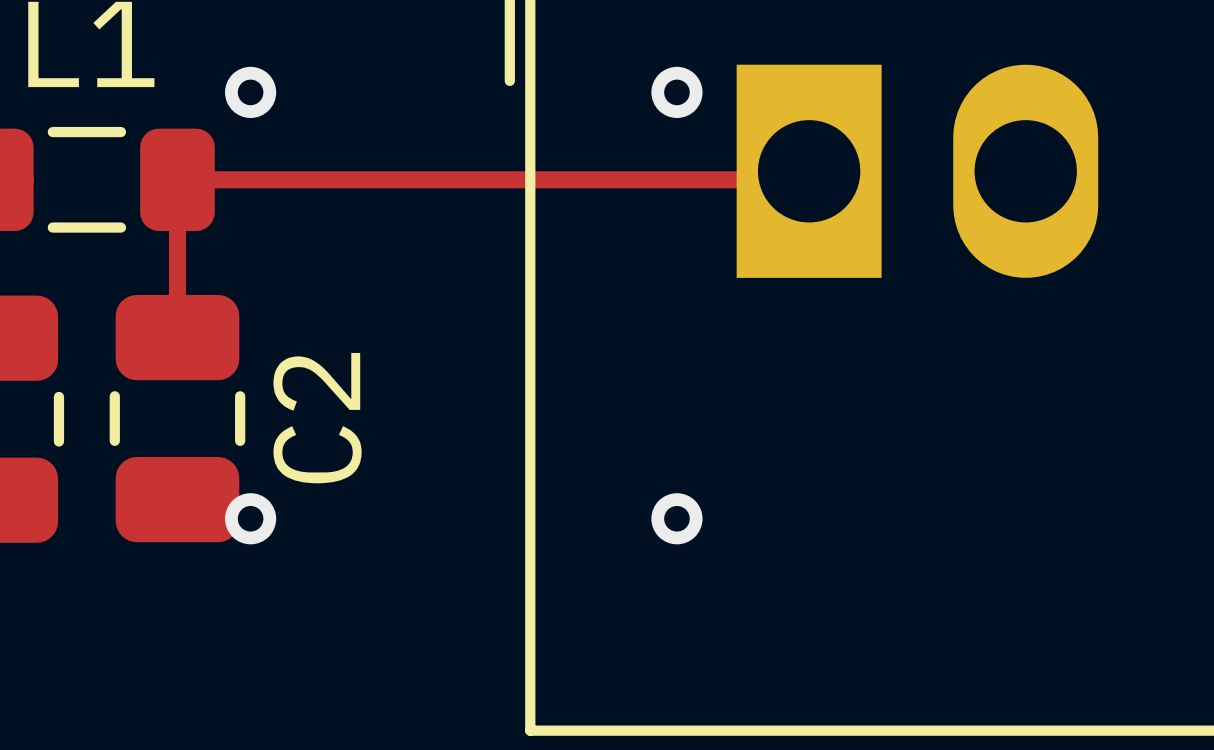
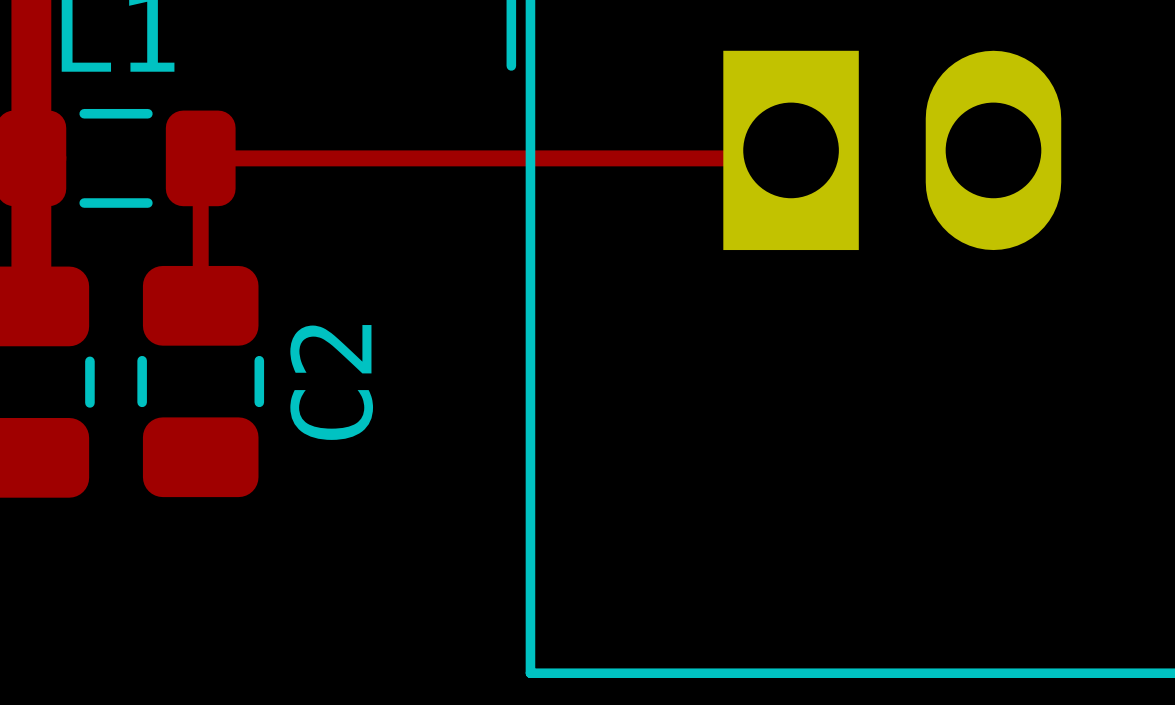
via: (250, 92) -> none
via: (676, 92) -> none
via: (250, 518) -> none
via: (676, 518) -> none

